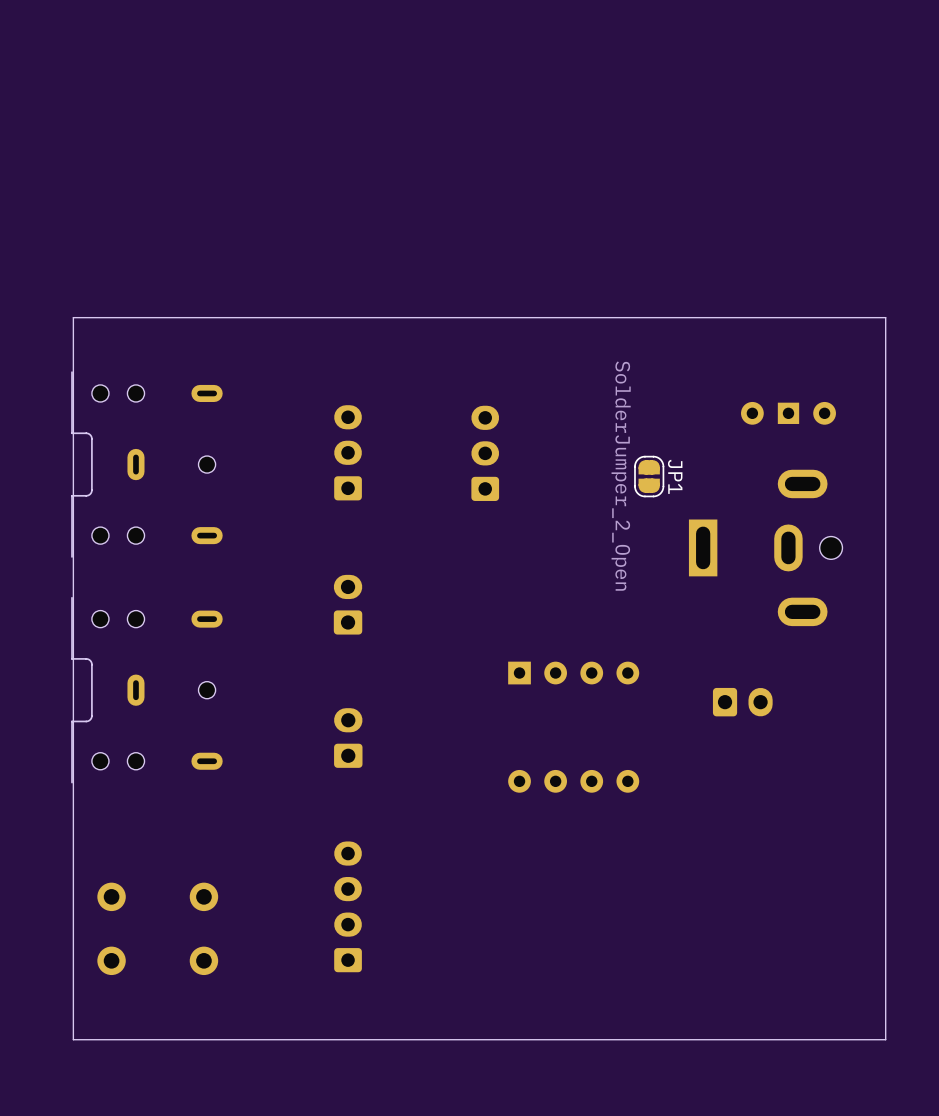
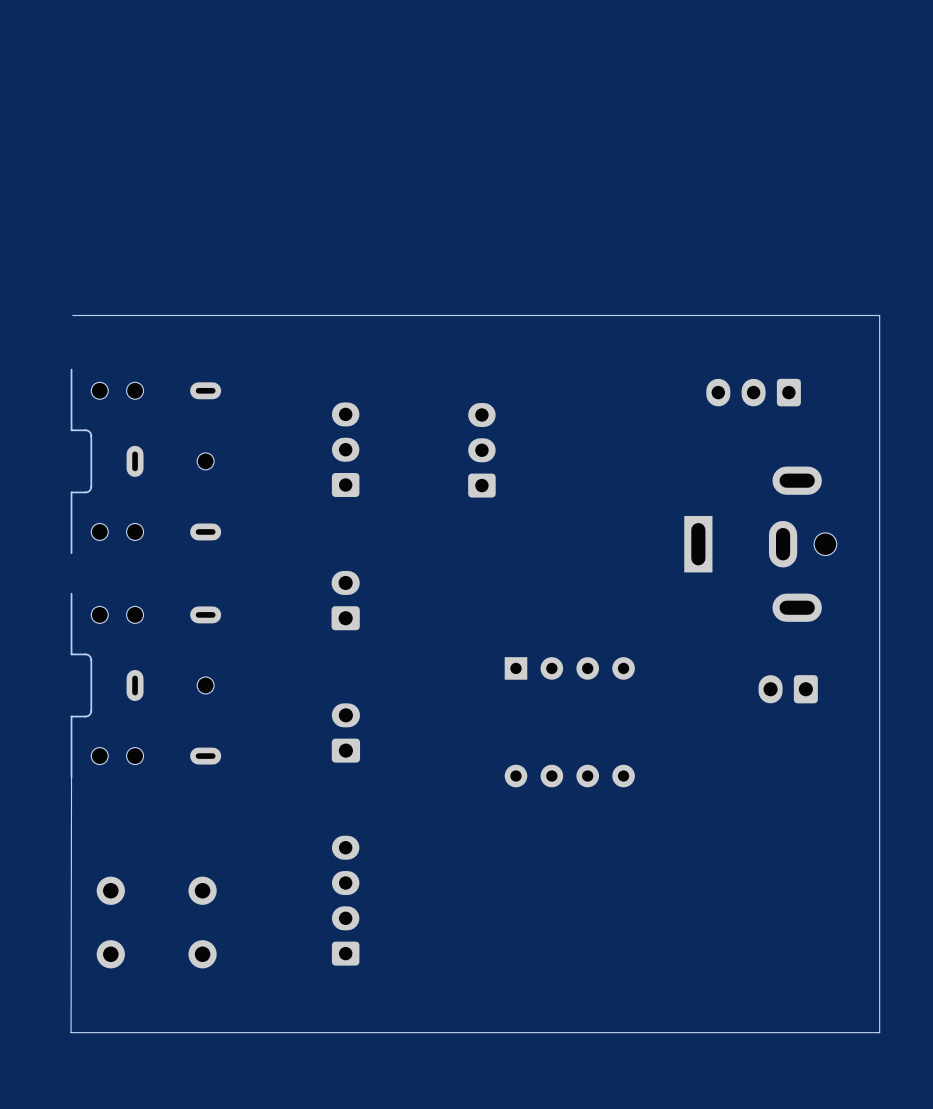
board edge: (73, 317) (73, 1039) -> (71, 777) (71, 1032) (72, 1032)
part: none -> (753, 392)
part: (788, 413) -> none
JP1: SolderJumper_2_Open (649, 476) -> none
part rotation: 0° (742, 702) -> 180° (788, 689)
part position: (742, 702) -> (788, 689)

